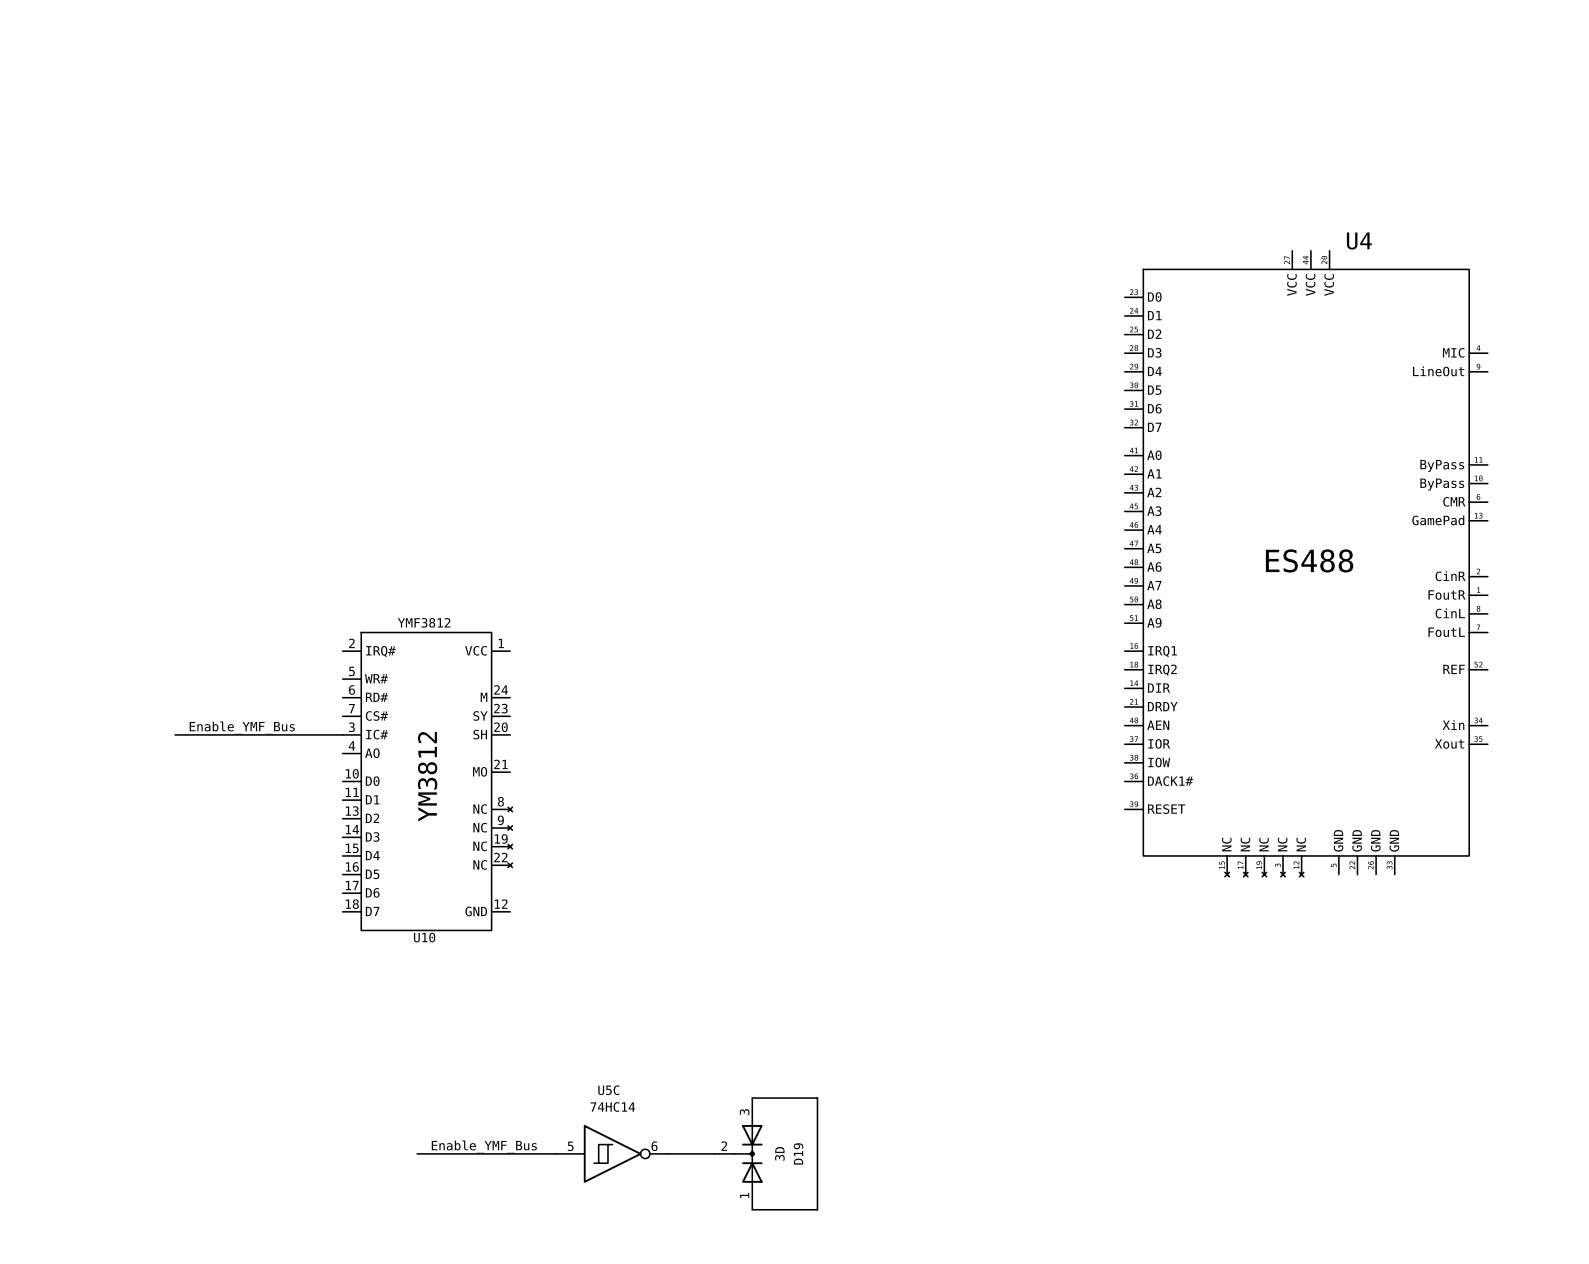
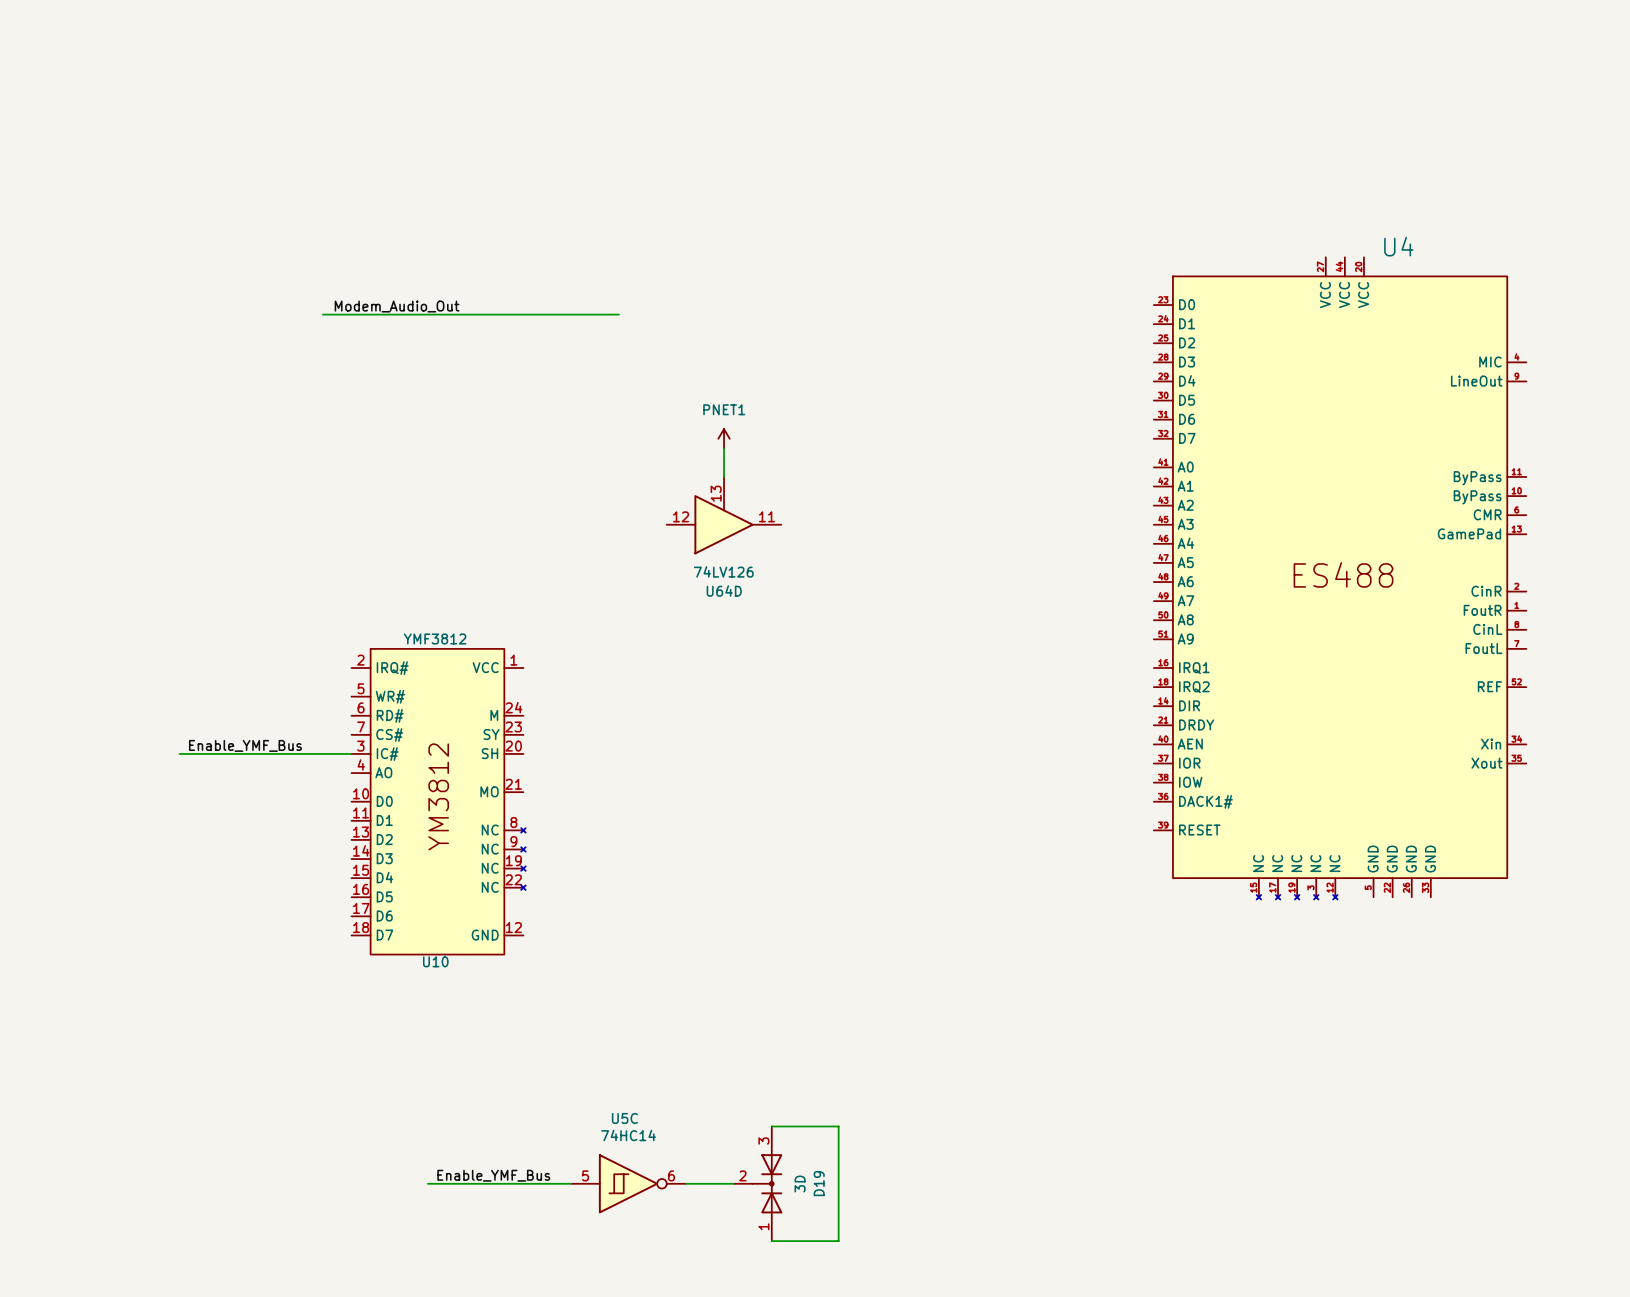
label: none -> Modem_Audio_Out (397, 306)
wire: none -> (322, 314) (618, 314)
power symbol: none -> PNET1 (724, 438)
wire: none -> (724, 448) (724, 476)
U64D: none -> 74LV126 (724, 515)

